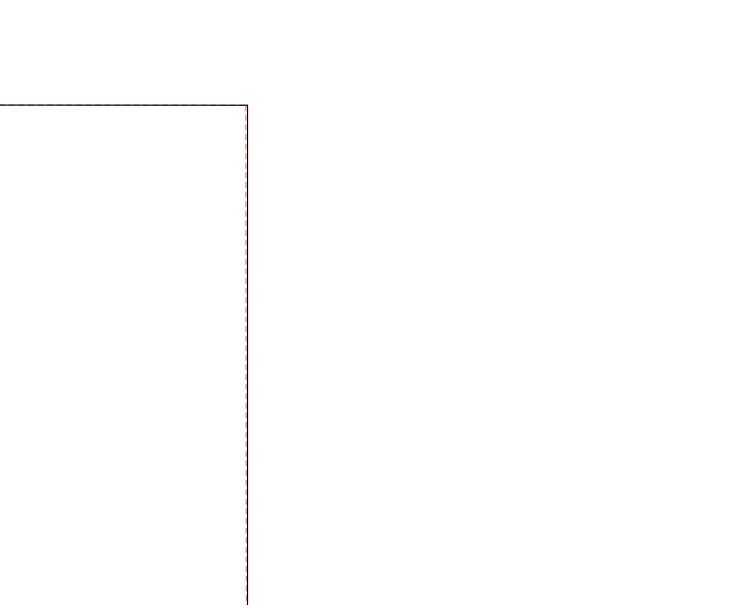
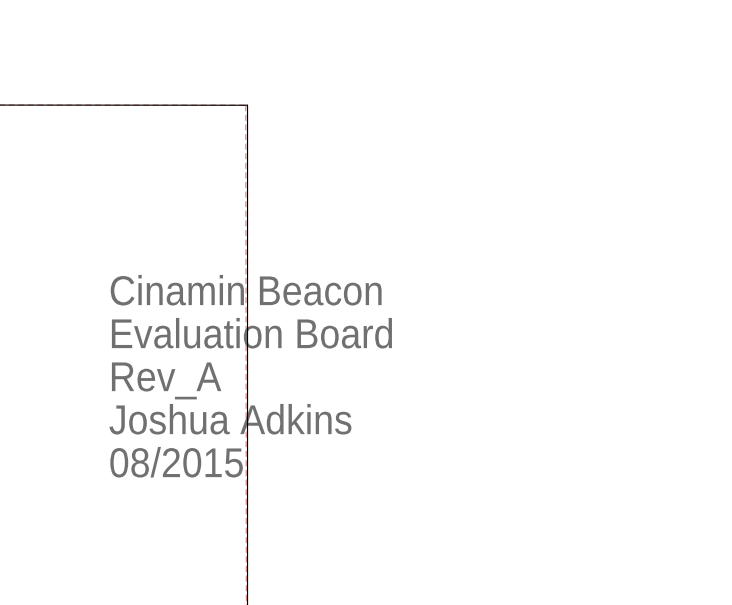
text: none -> Cinamin Beacon (246, 290)
text: none -> Evaluation Board (251, 333)
text: none -> Rev_A (166, 380)
text: none -> Joshua Adkins (230, 419)
text: none -> 08/2015 (176, 462)

